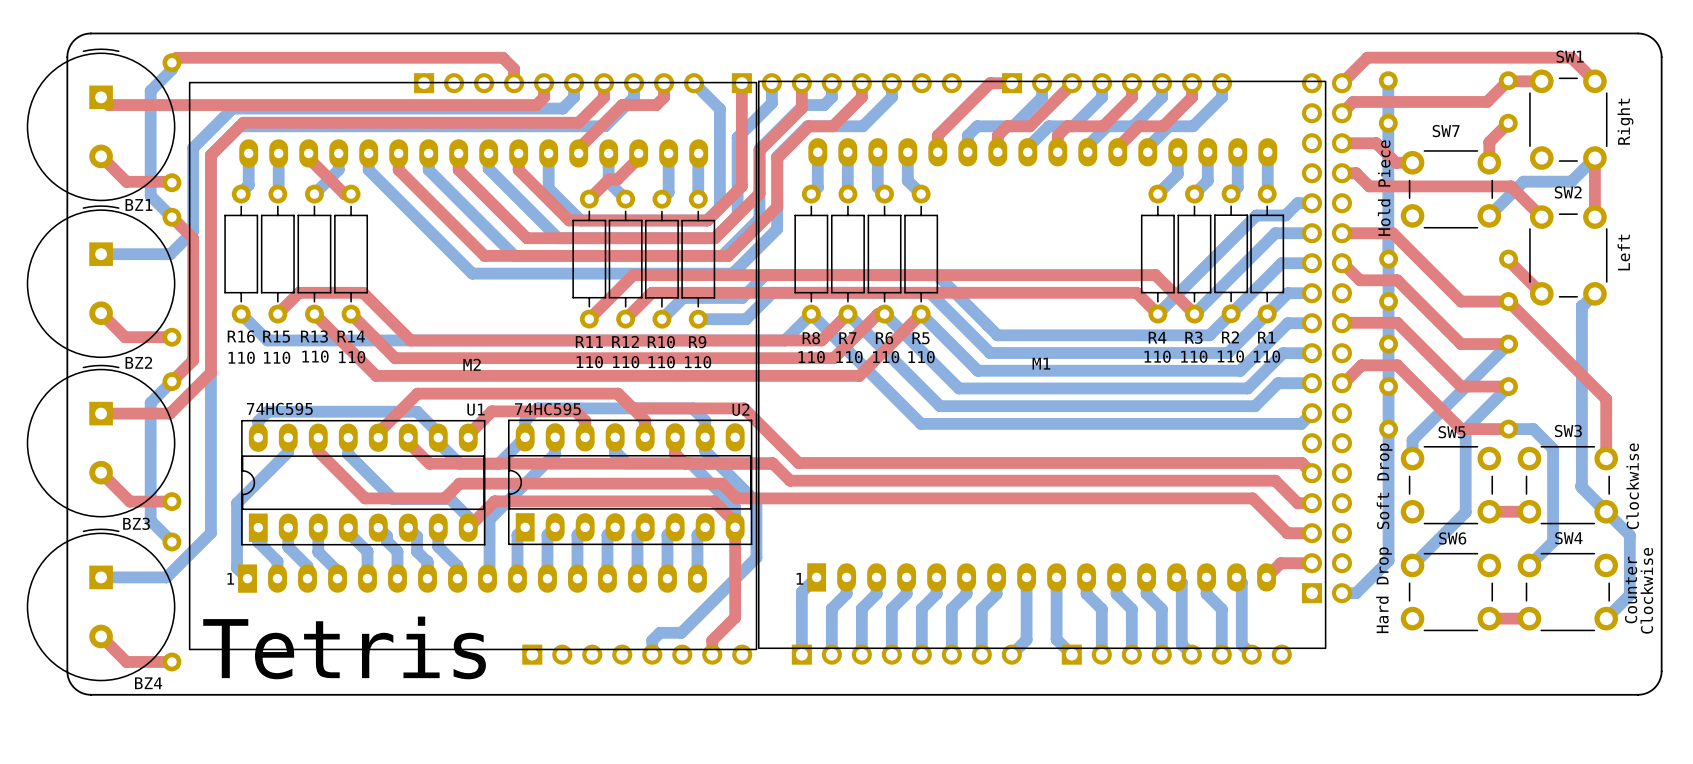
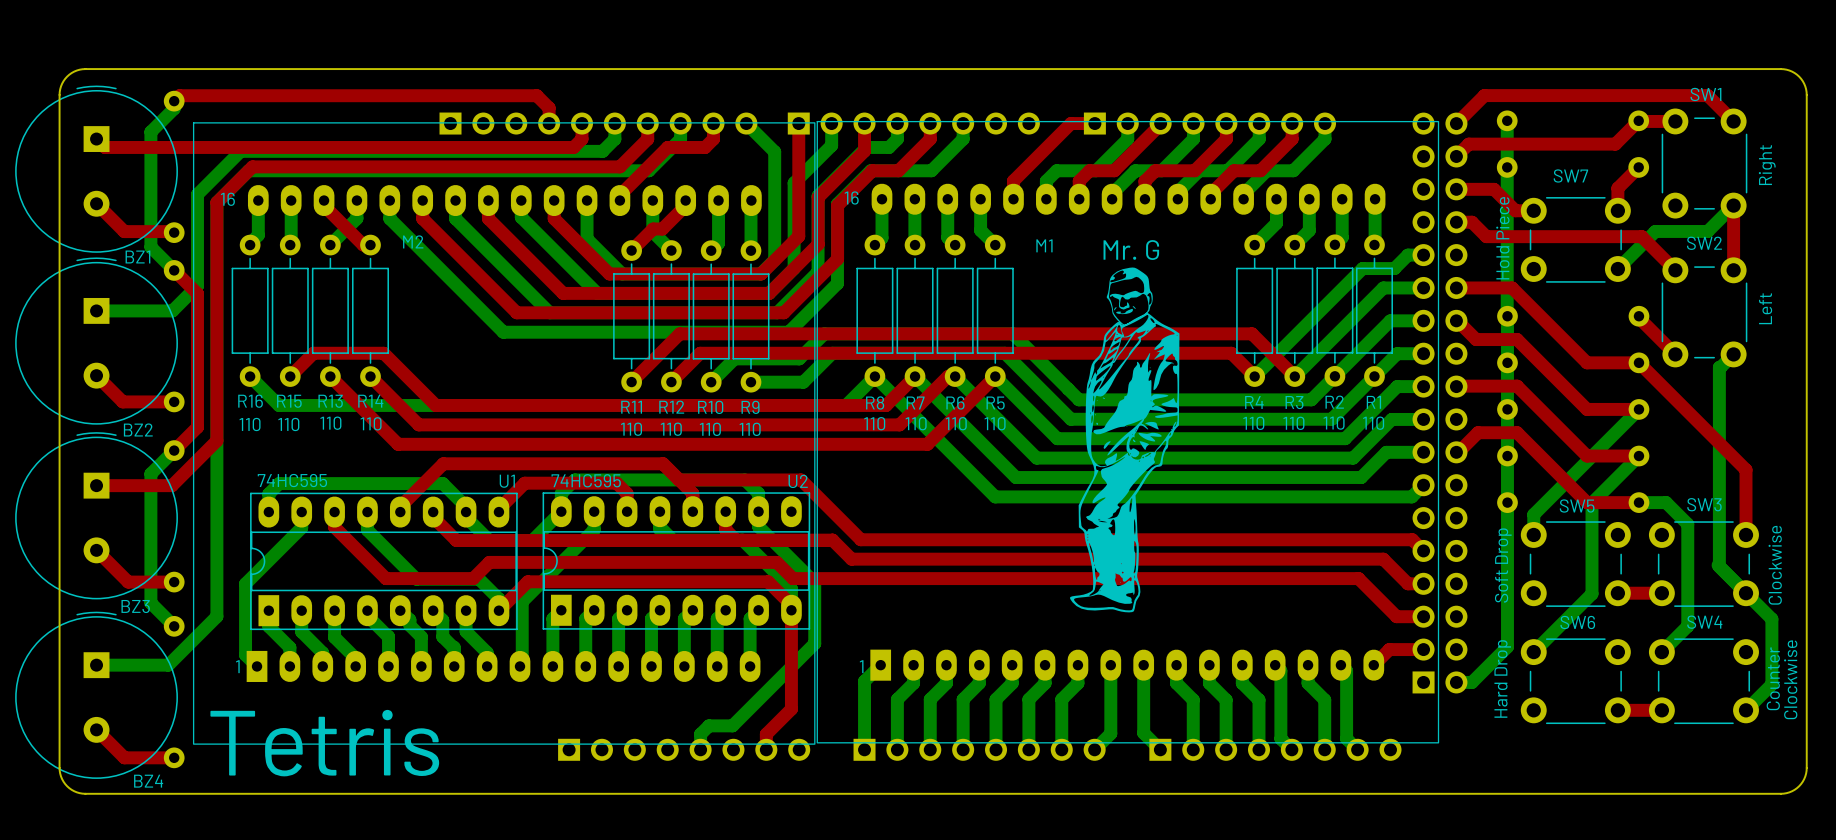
M1 text: none -> 16 (851, 197)
M2 text: none -> 16 (227, 199)
drawing: none -> [1106, 267, 1153, 326]
M1 name position: M1 (1041, 363) -> M1 (1044, 245)
M2 name position: M2 (472, 364) -> M2 (413, 241)
Mr. G: none -> (1124, 462)

